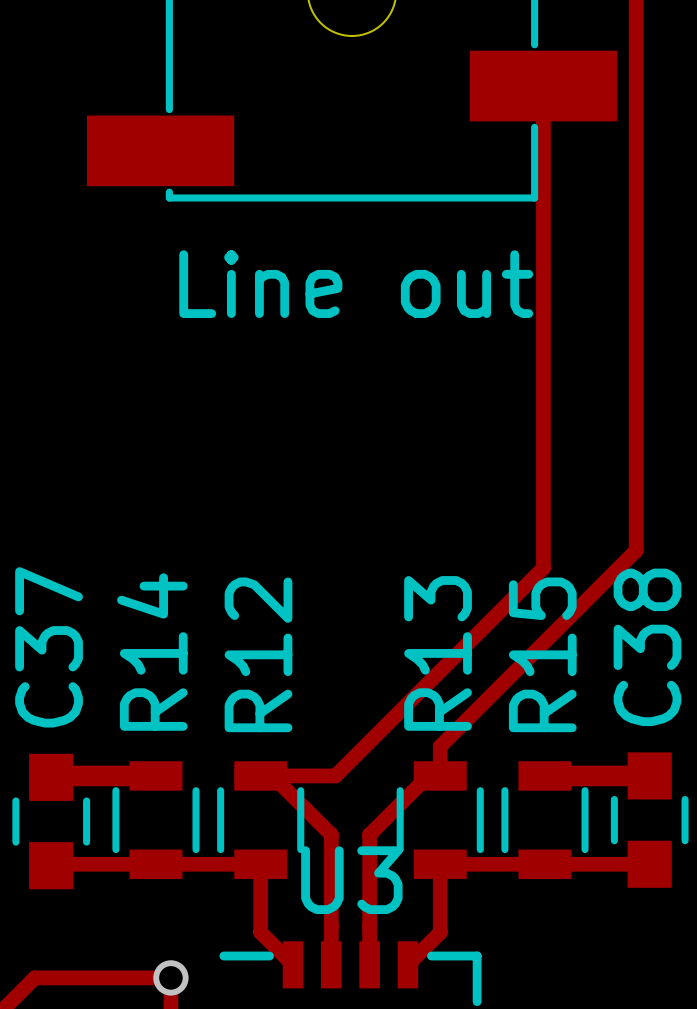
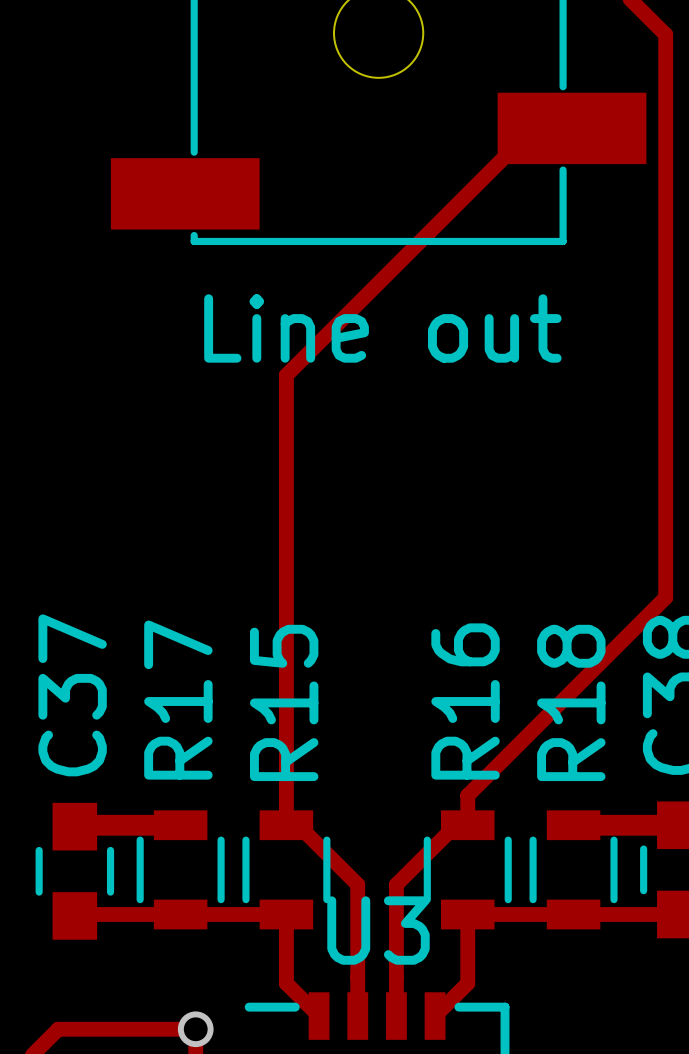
track: (543, 86) (543, 568) (335, 775) (272, 775) -> (572, 128) (533, 128) (286, 375) (286, 825)
R14 name: R14 (152, 652) -> R17 (178, 700)
R13 name: R13 (438, 653) -> R16 (465, 701)
R12 name: R12 (258, 654) -> R15 (284, 702)
R15 name: R15 (542, 654) -> R18 (571, 702)

